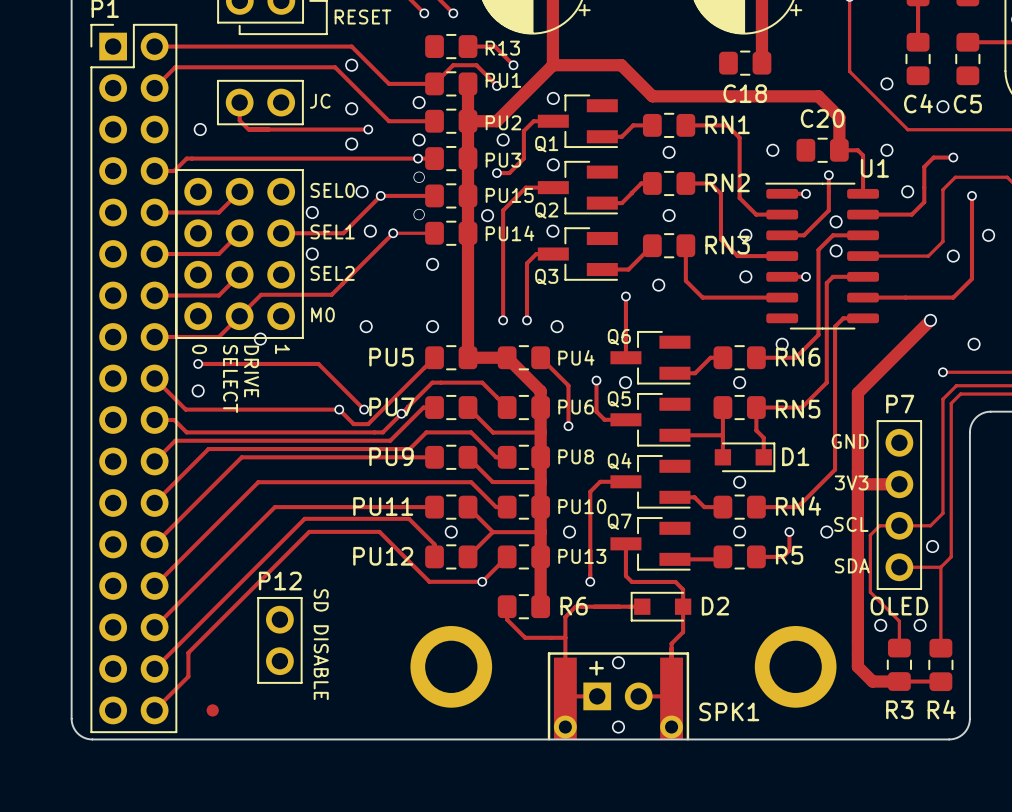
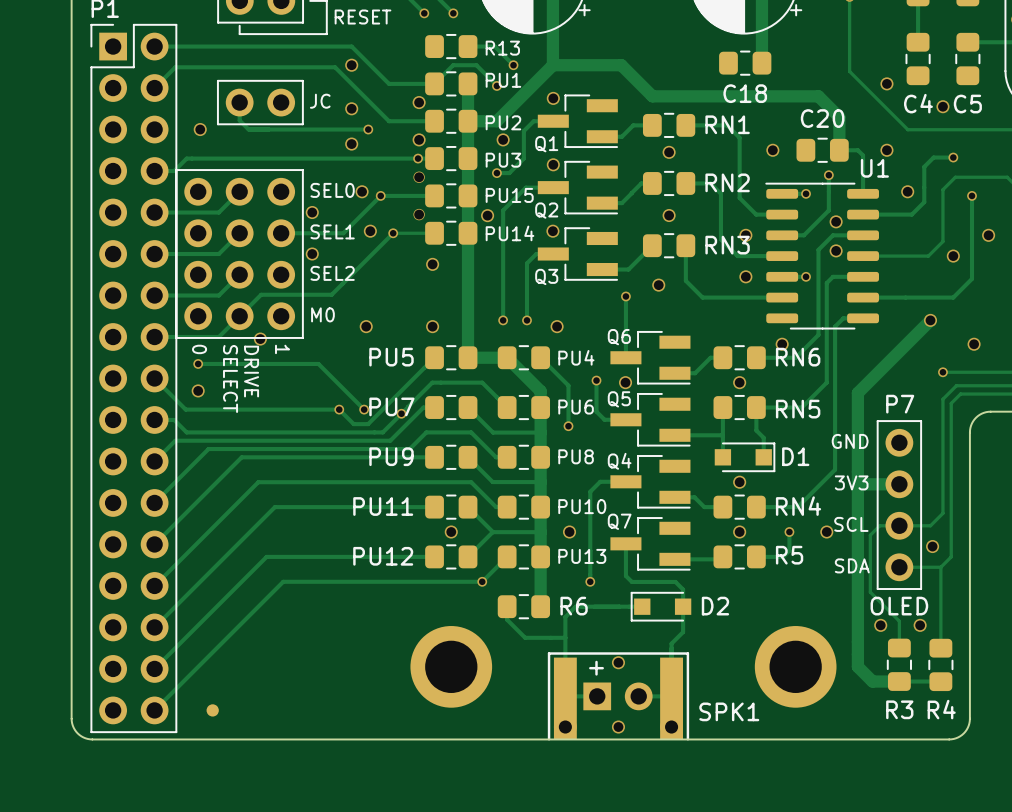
track: (266, 556) (304, 518) (408, 518) (434, 544) (434, 556) -> (266, 556) (434, 556)
track: (429, 581) (379, 531) (309, 531) (188, 652) (188, 676) -> (429, 581) (283, 581) (188, 676)
P12: SD DISABLE (279, 640) -> none

